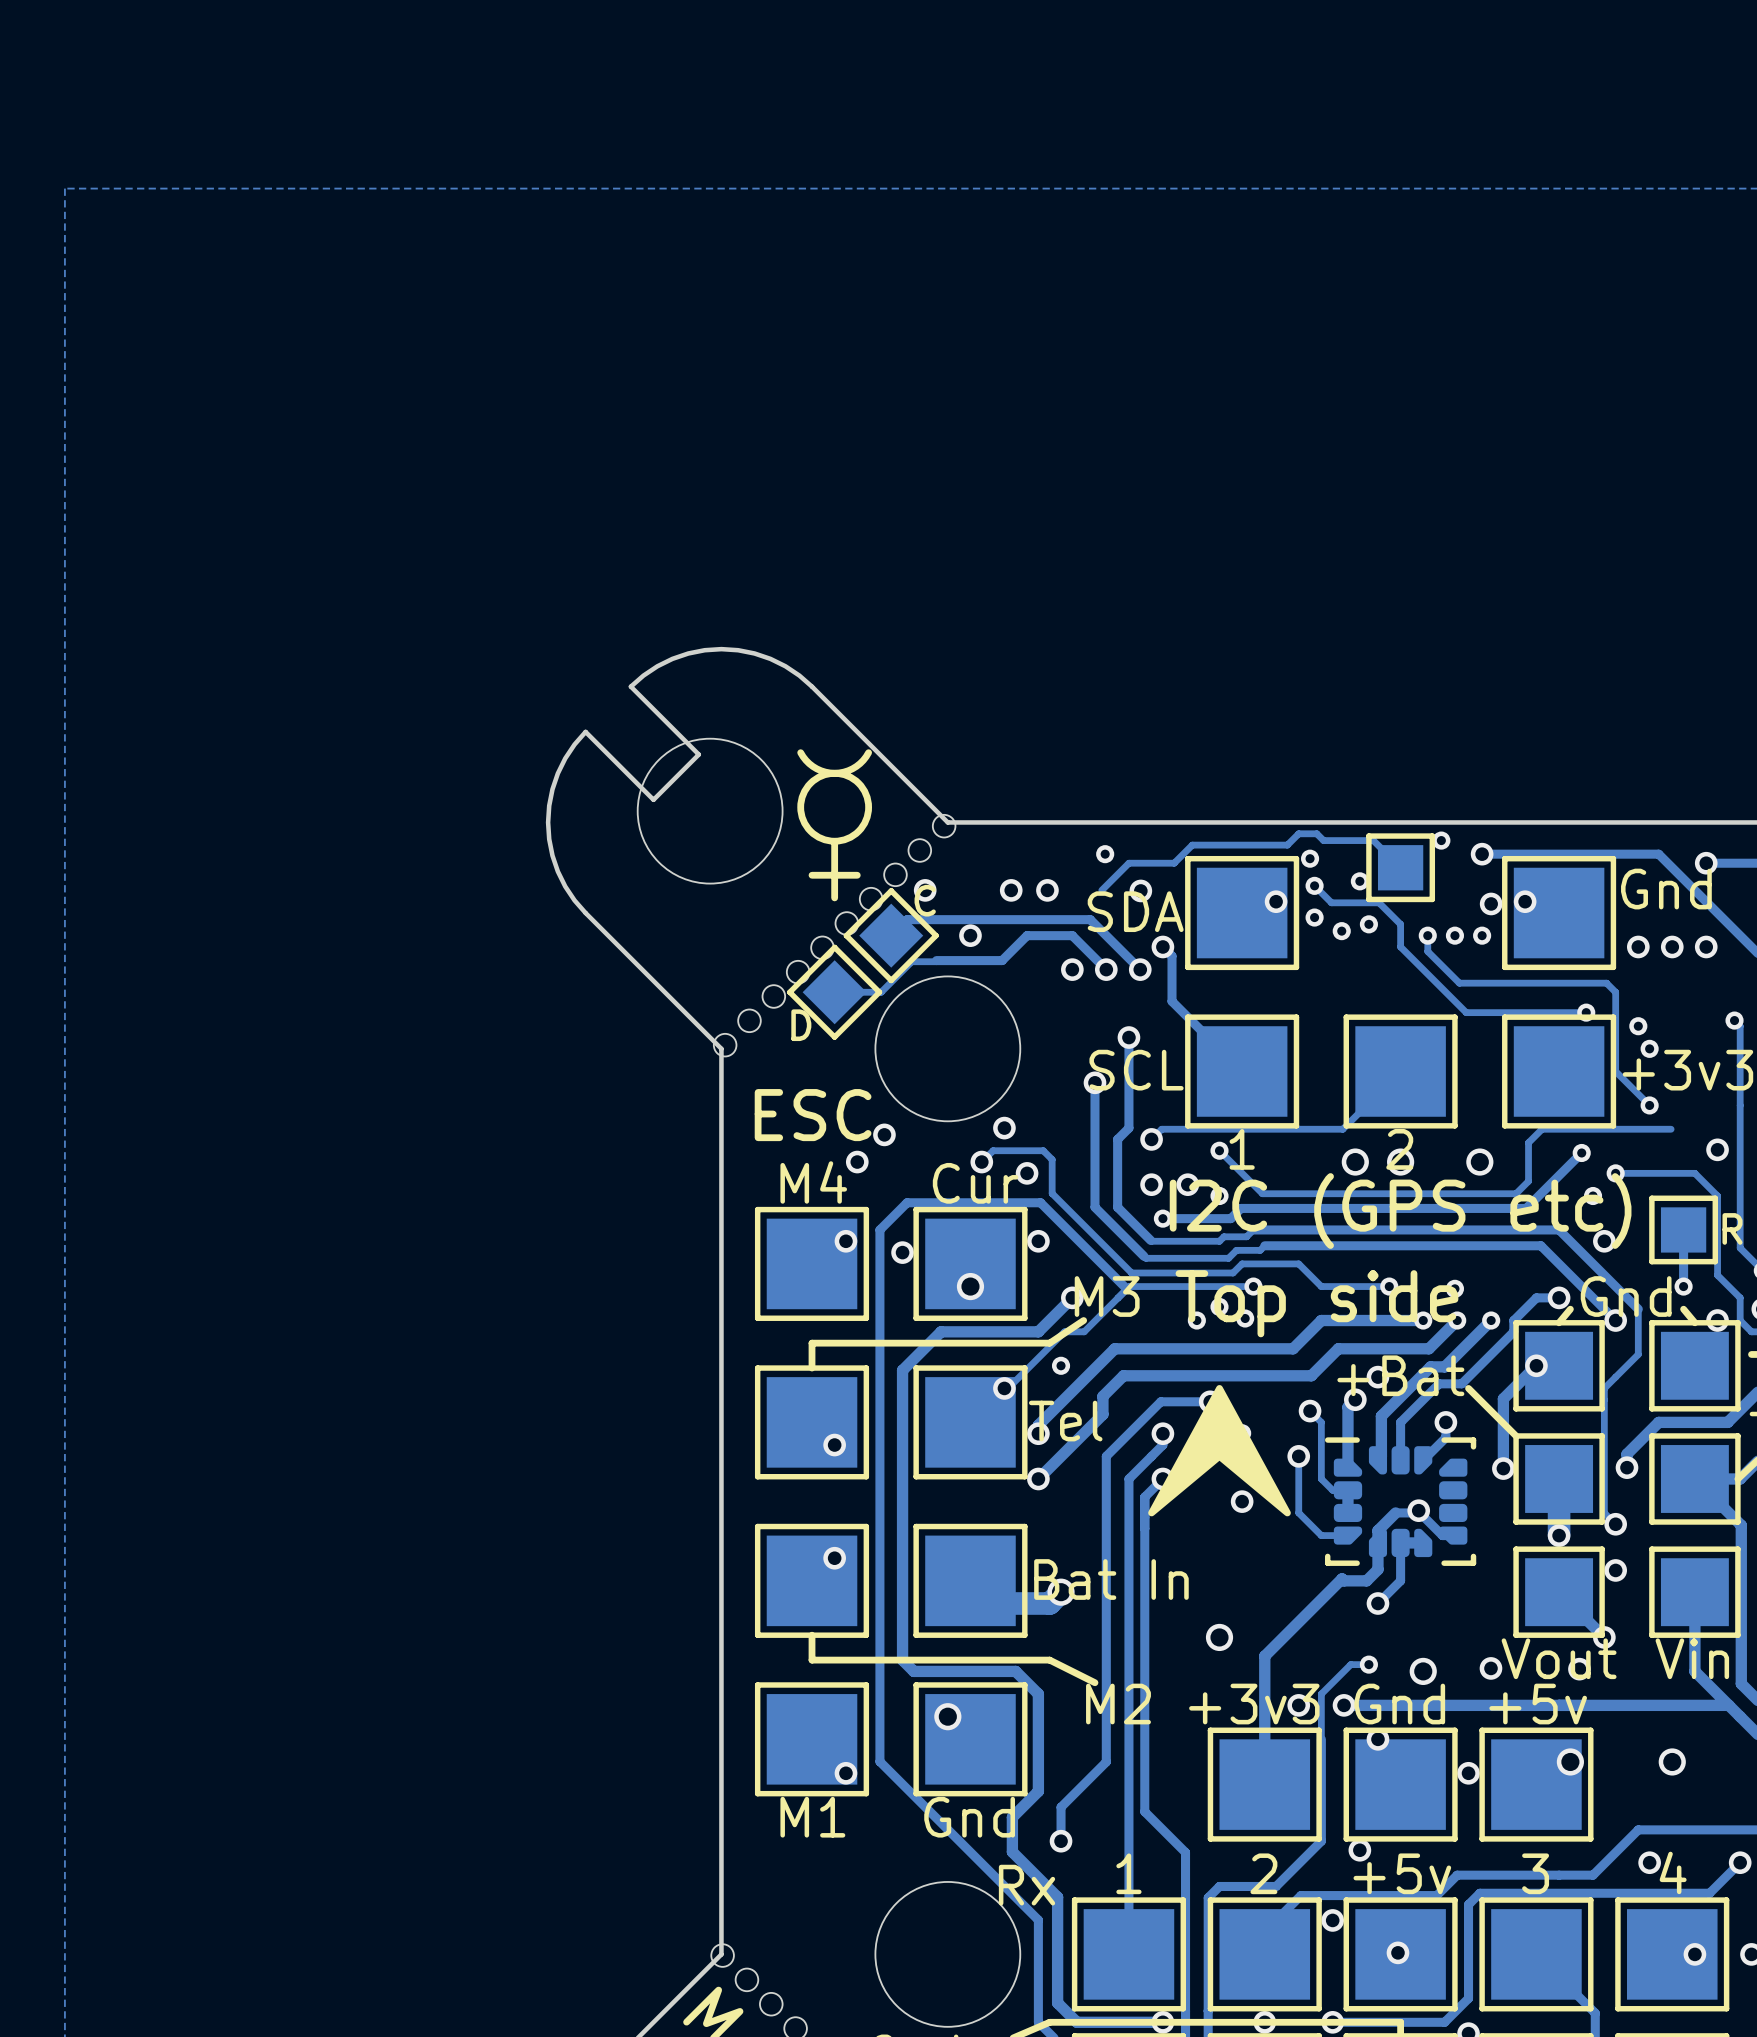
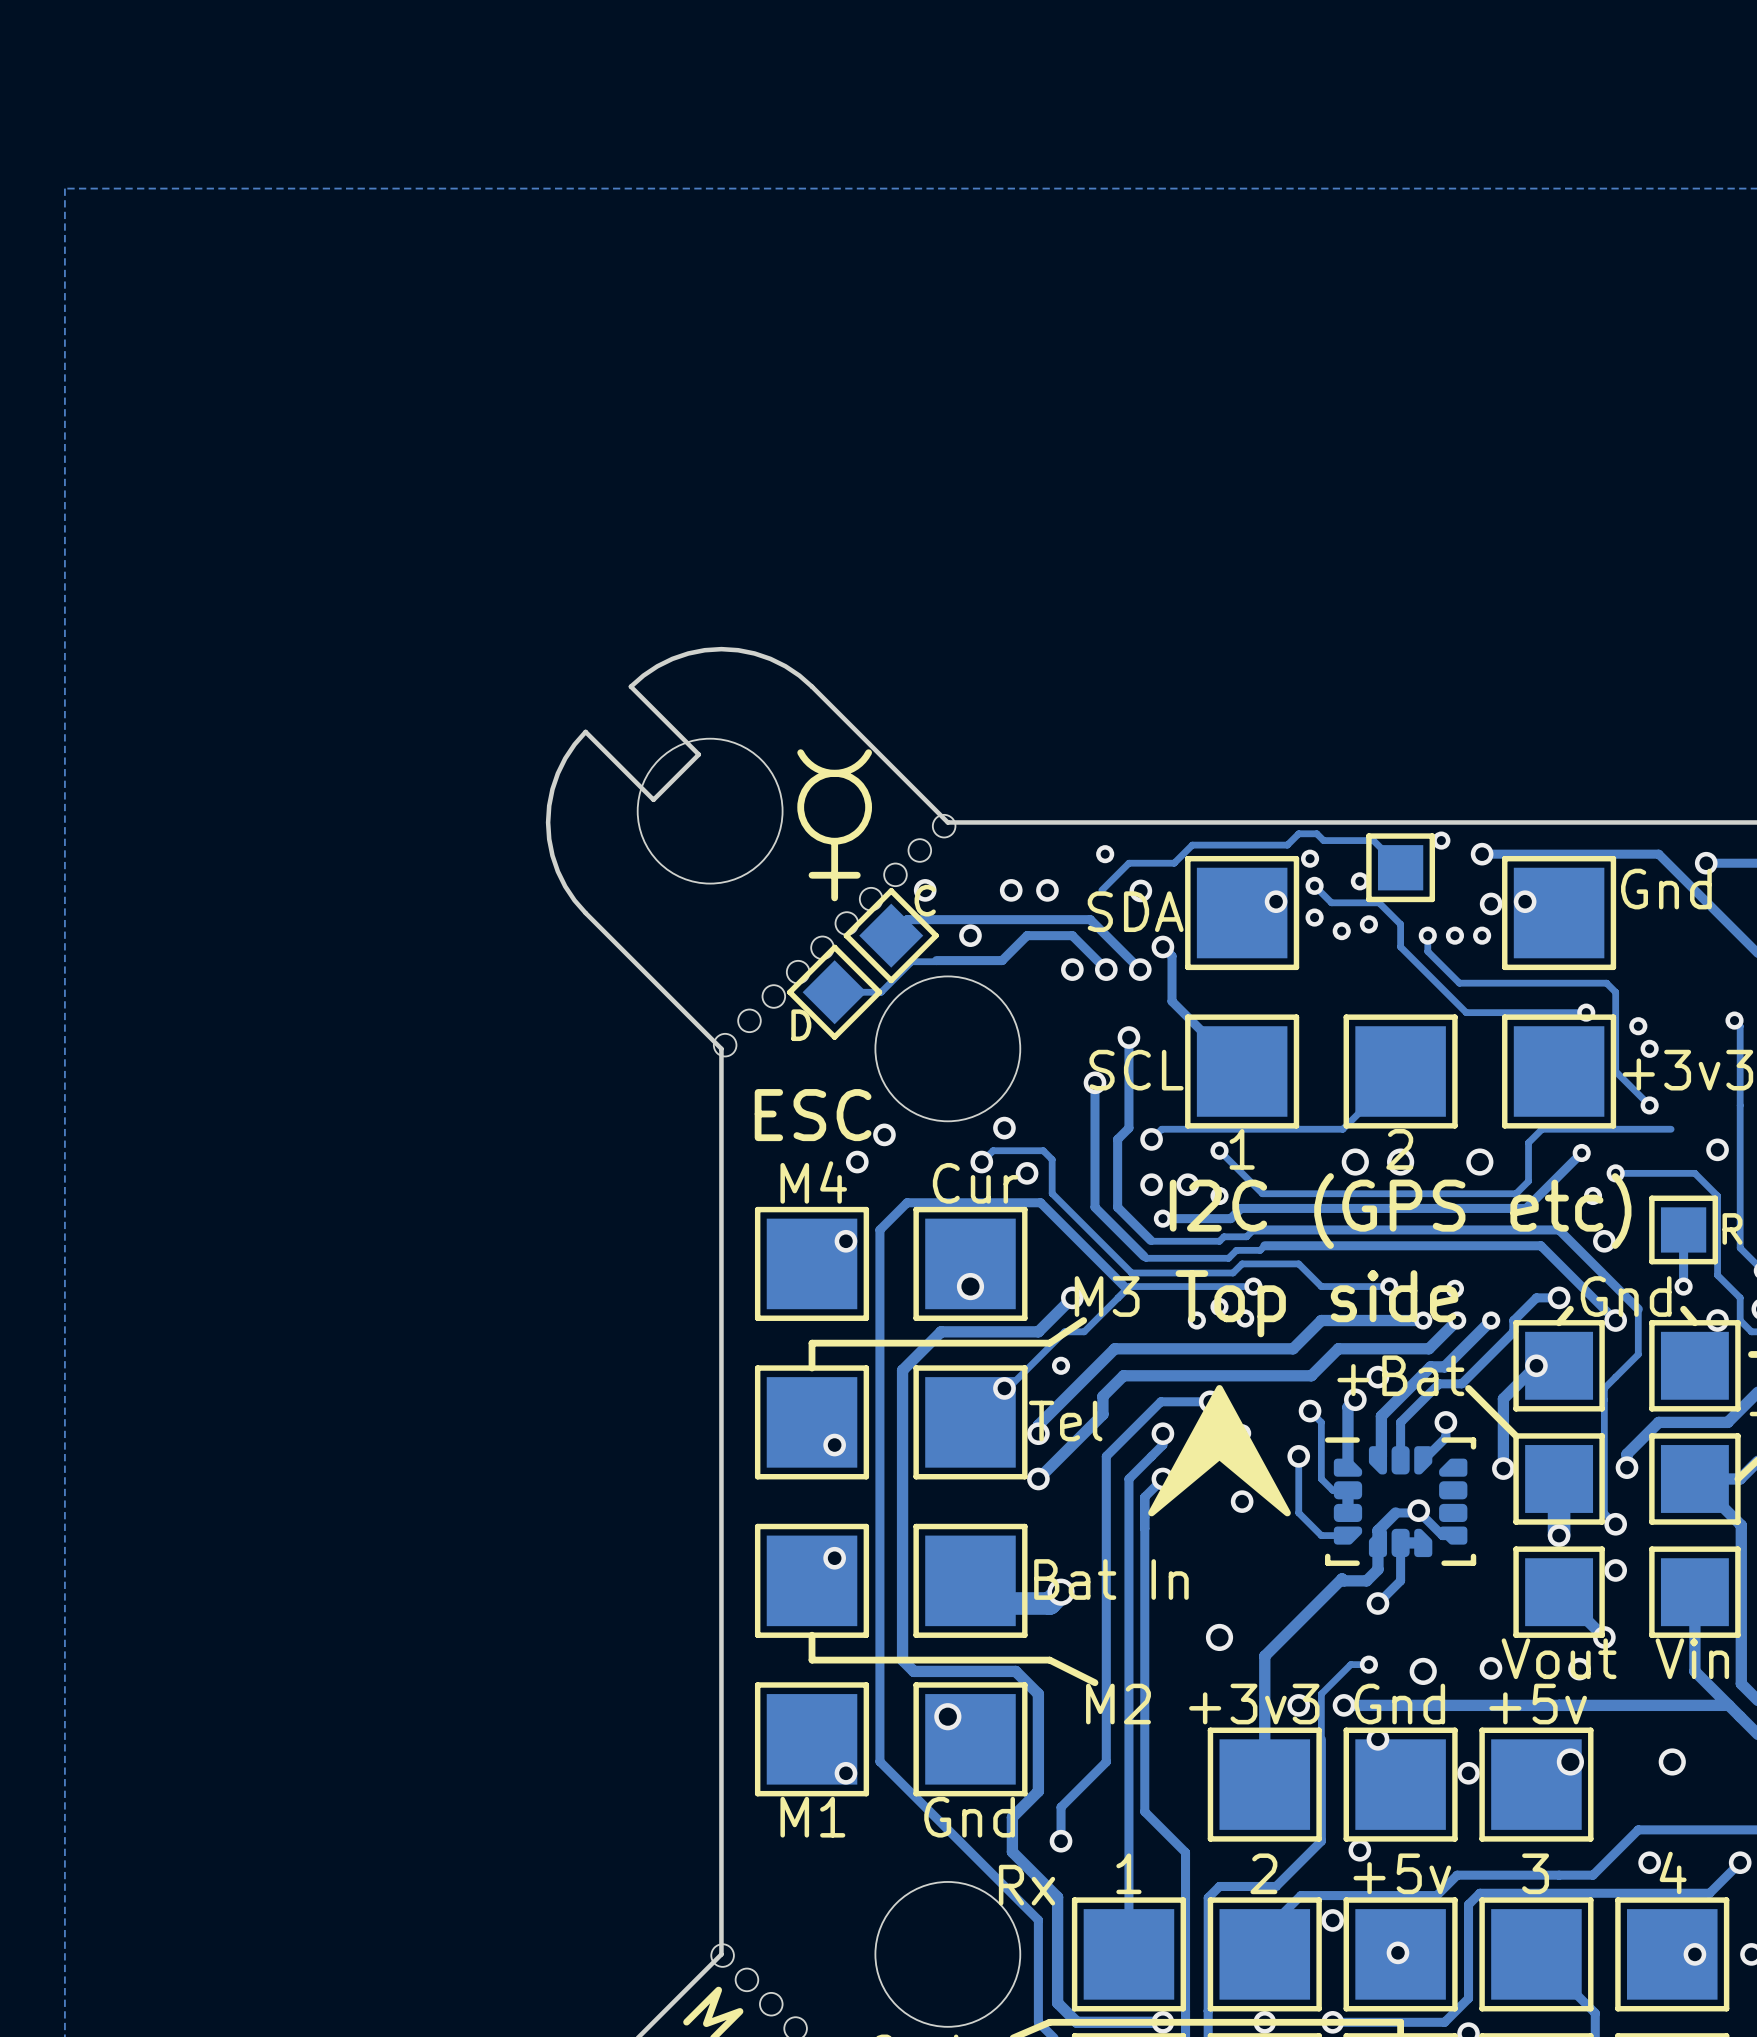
via: (1638, 946) -> none
via: (1672, 946) -> none
via: (1706, 946) -> none
via: (1038, 1241) -> none
via: (902, 1252) -> none

